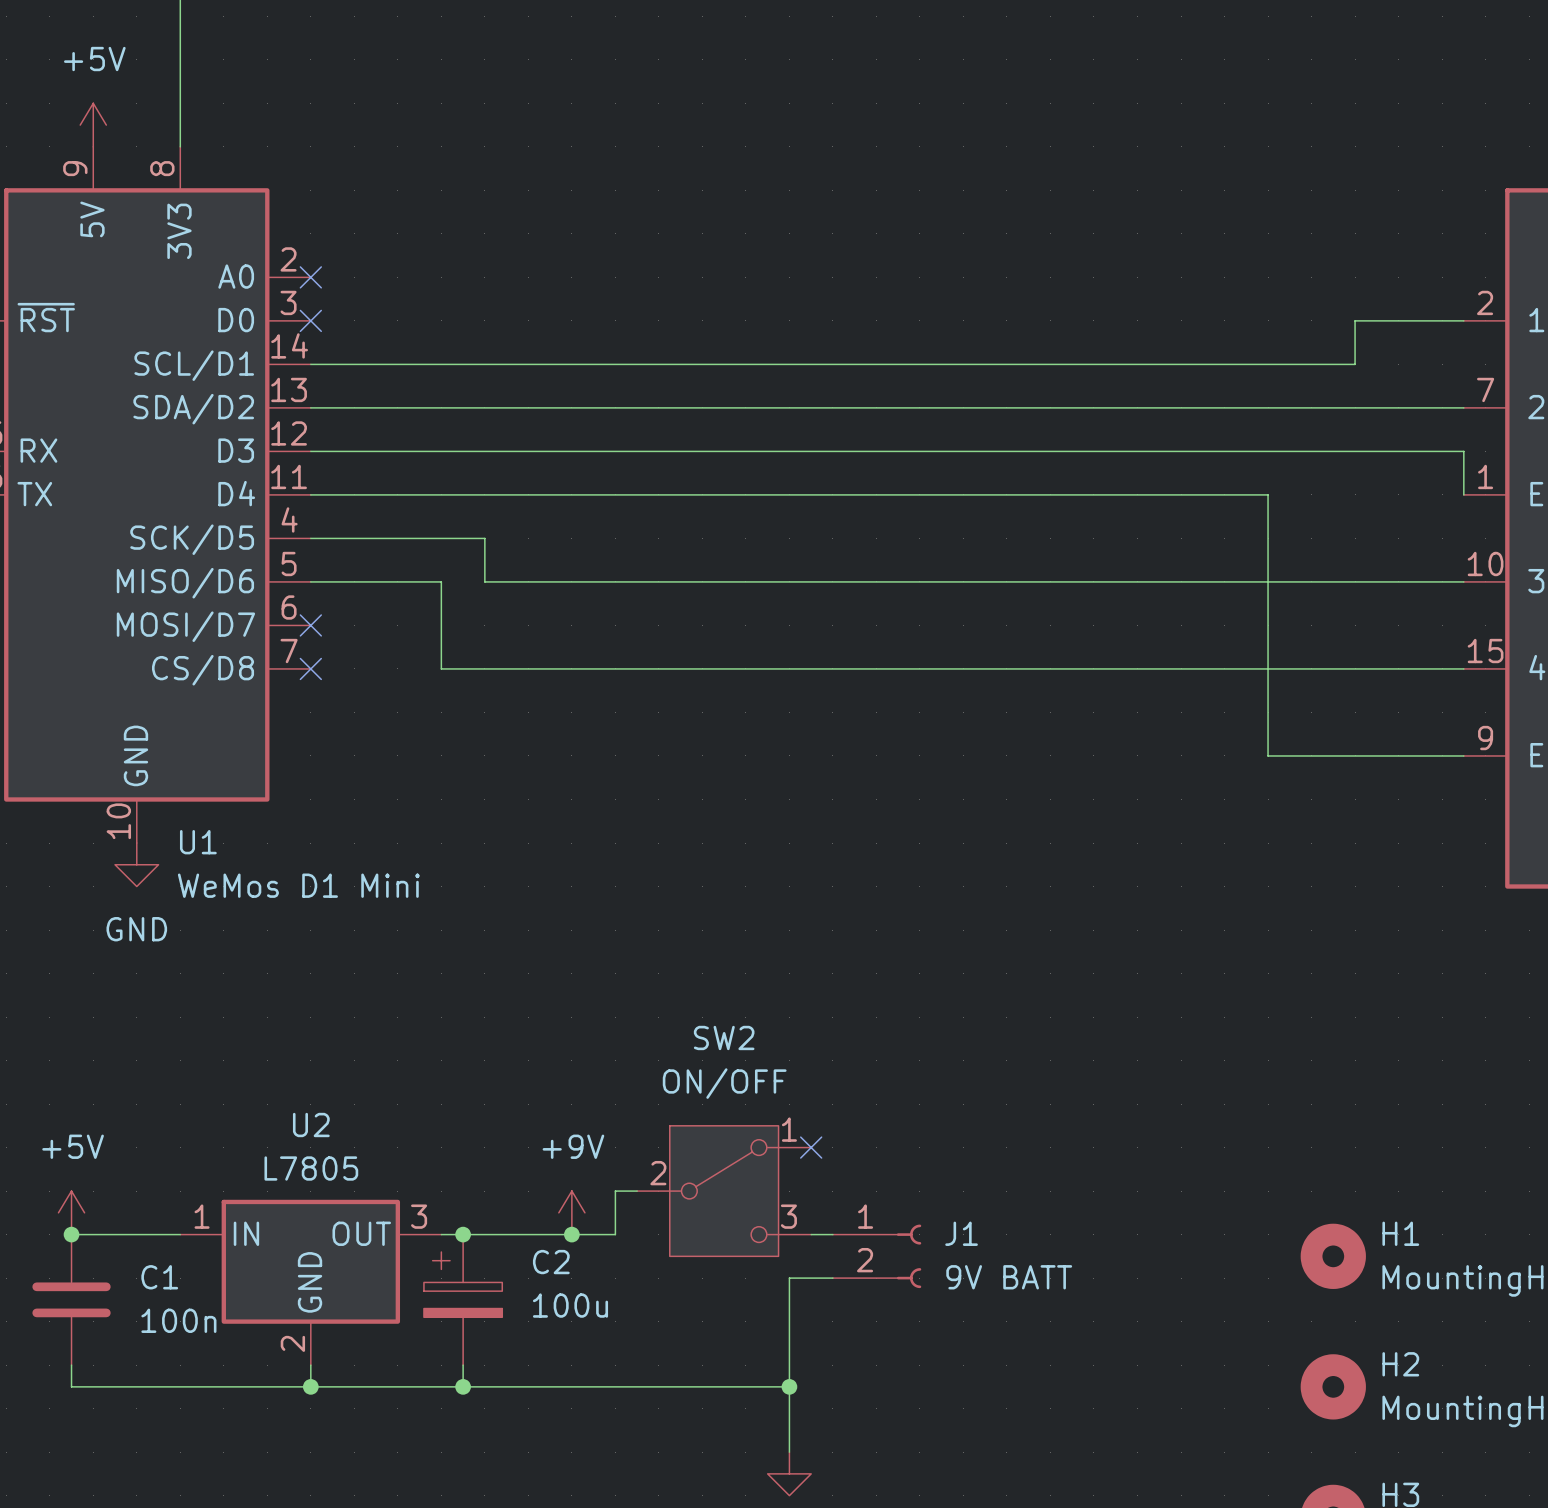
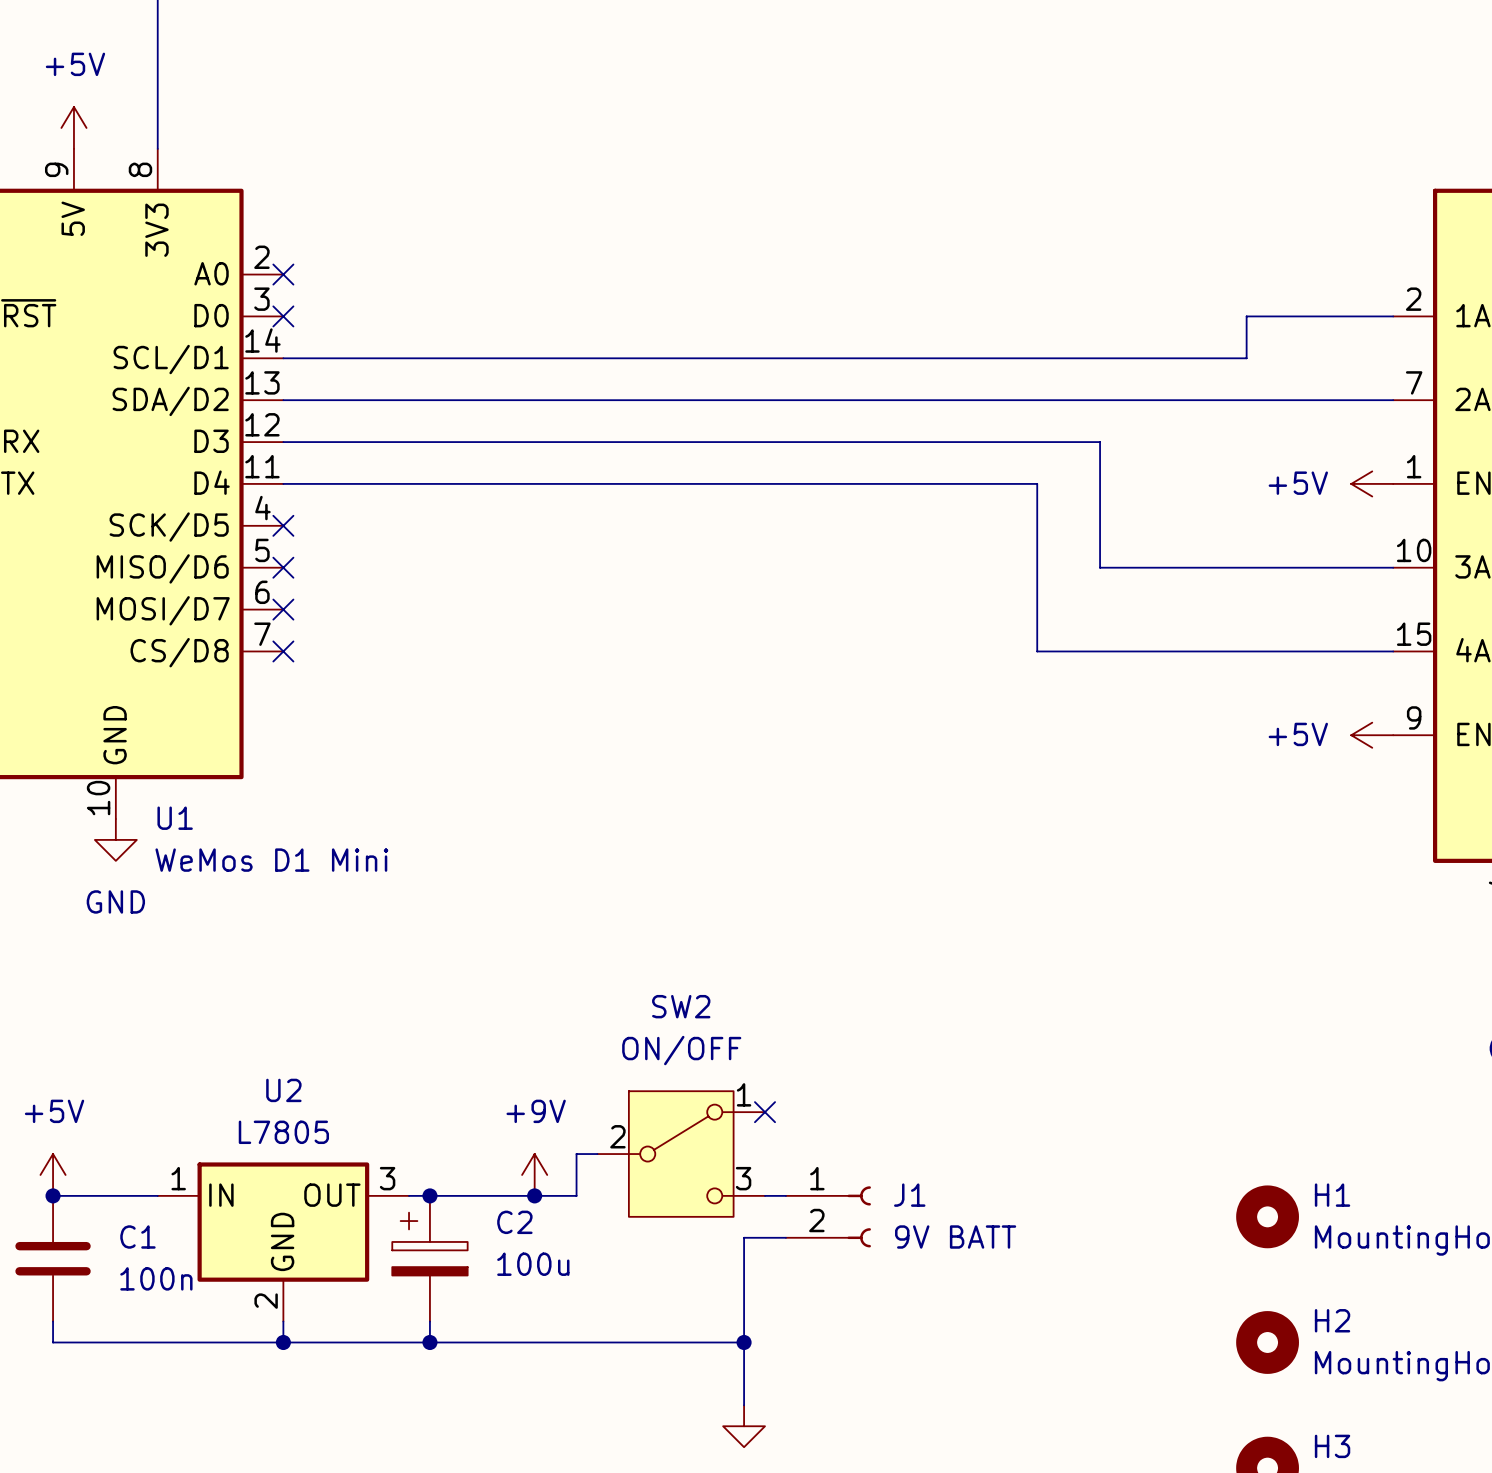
wire: (1355, 320) (1355, 364) (1311, 364) -> (1288, 316) (1246, 316) (1246, 358)
wire: (1159, 451) (1463, 451) (1463, 494) -> (1100, 442) (1100, 567)
wire: (1093, 494) (1268, 494) (1268, 755) (1463, 755) -> (1037, 483) (1037, 651)
power symbol: none -> +5V (1372, 483)
wire: (310, 538) (484, 538) (484, 581) (1159, 581) -> none
no-connect mark: none -> (283, 525)
wire: (310, 581) (441, 581) (441, 668) (1093, 668) -> none
no-connect mark: none -> (283, 567)
power symbol: none -> +5V (1372, 735)

